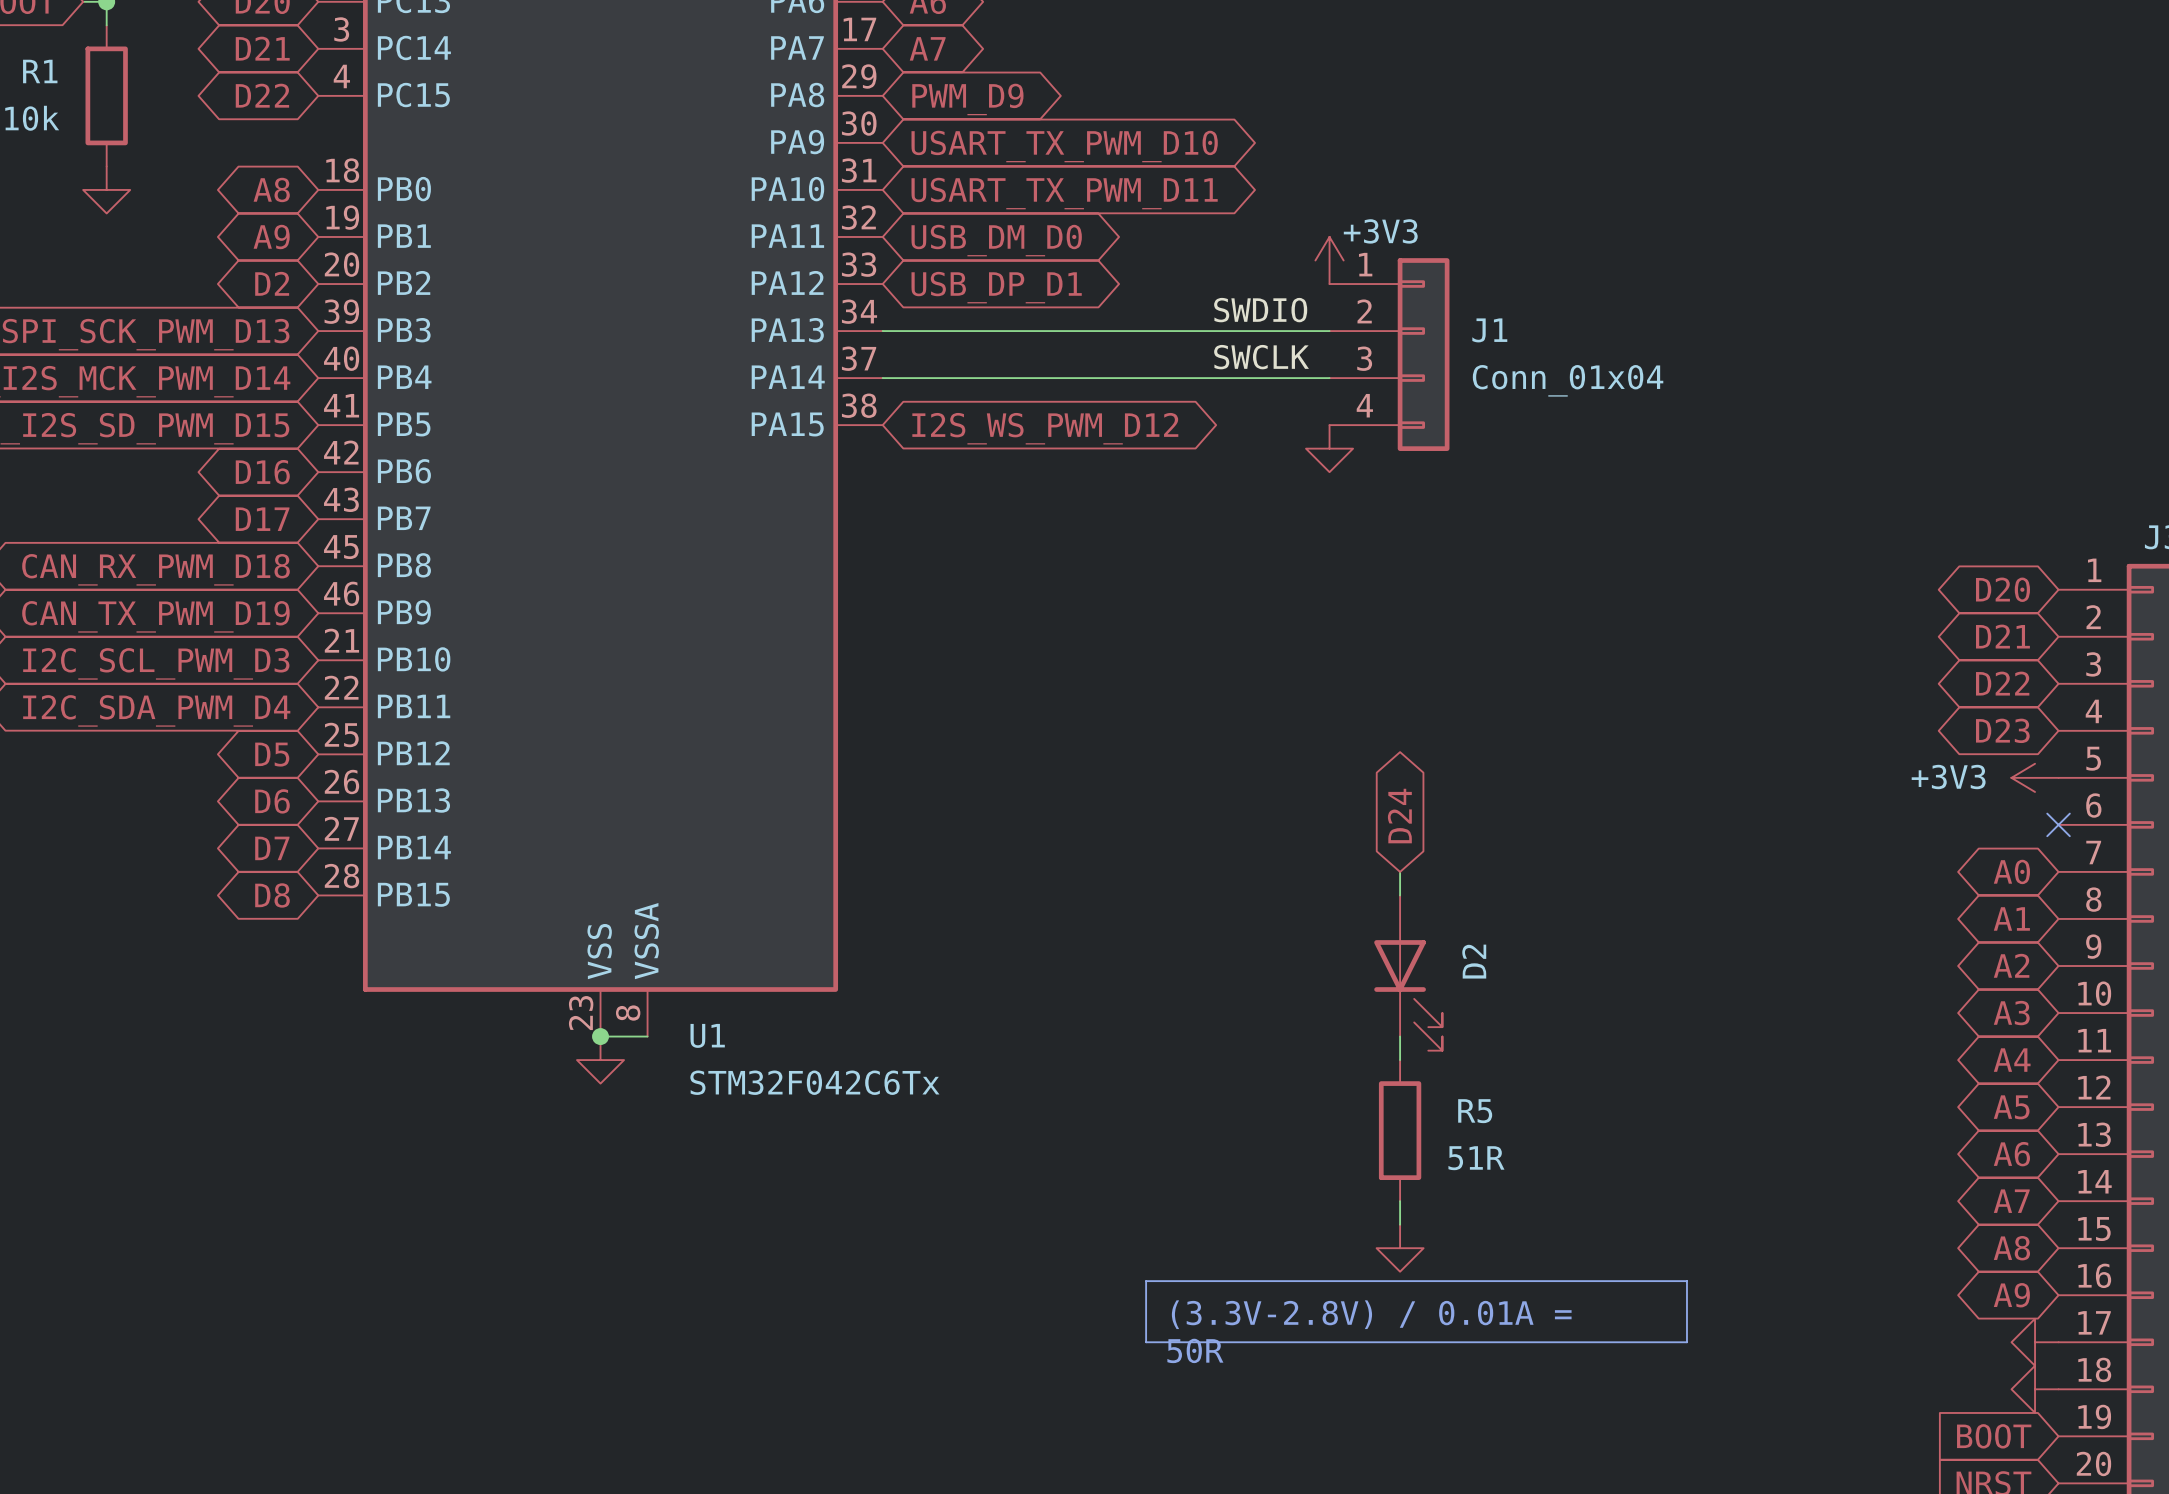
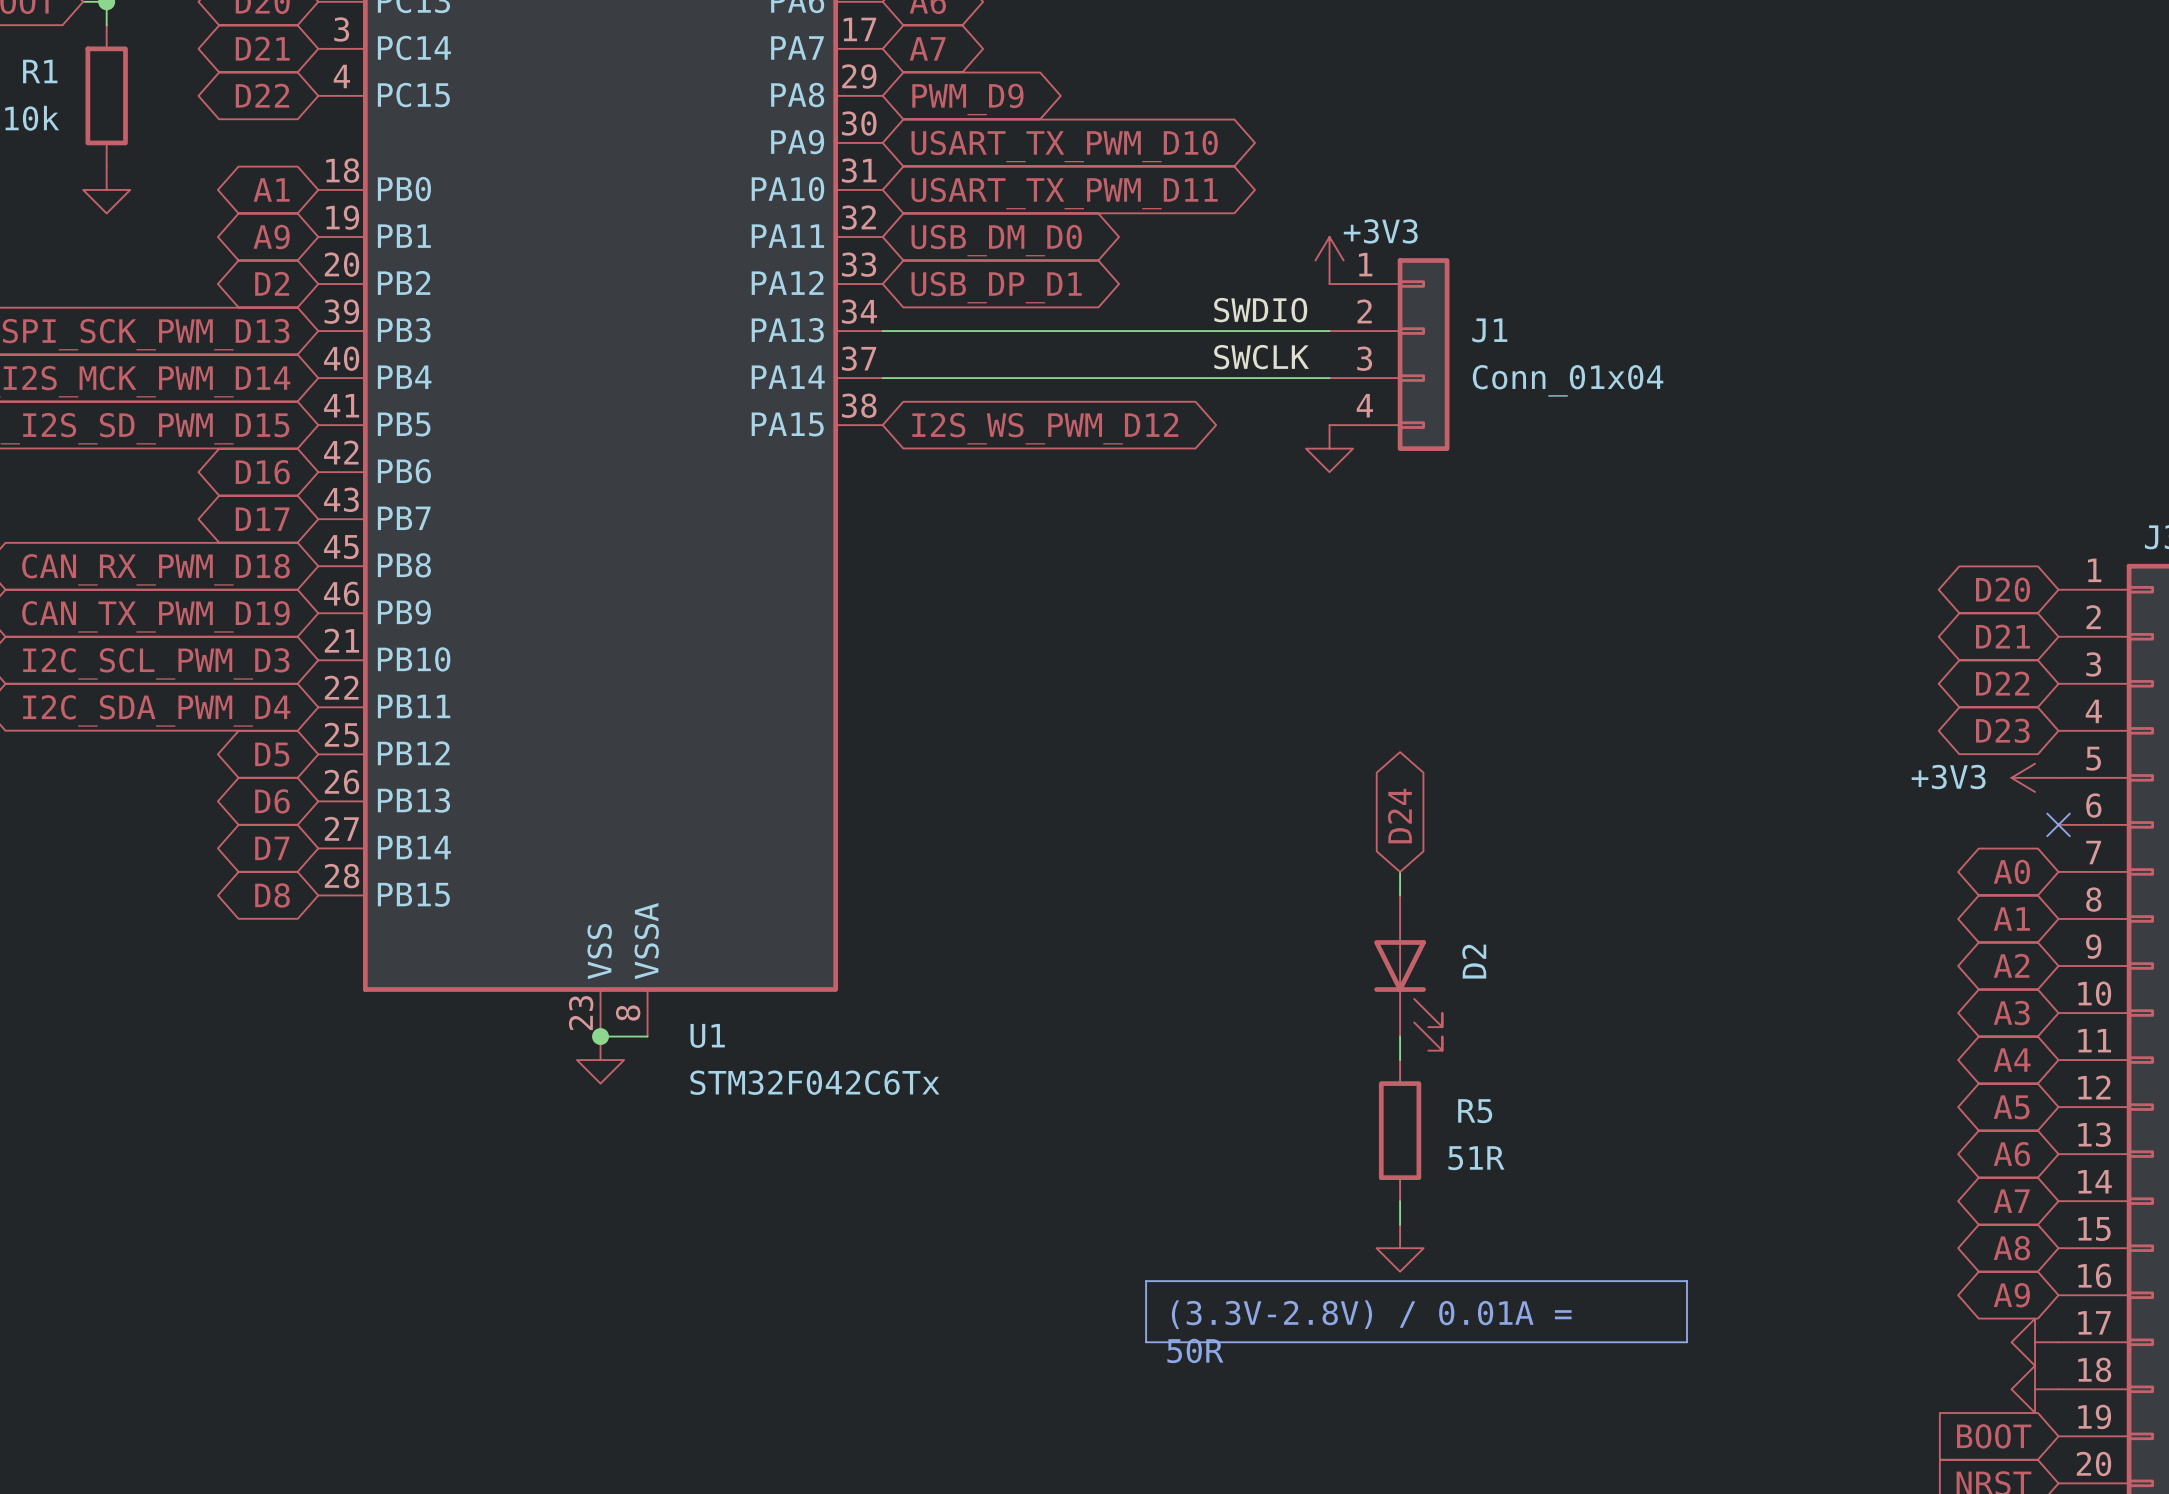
global label: A8 (271, 189) -> A1 (271, 189)

